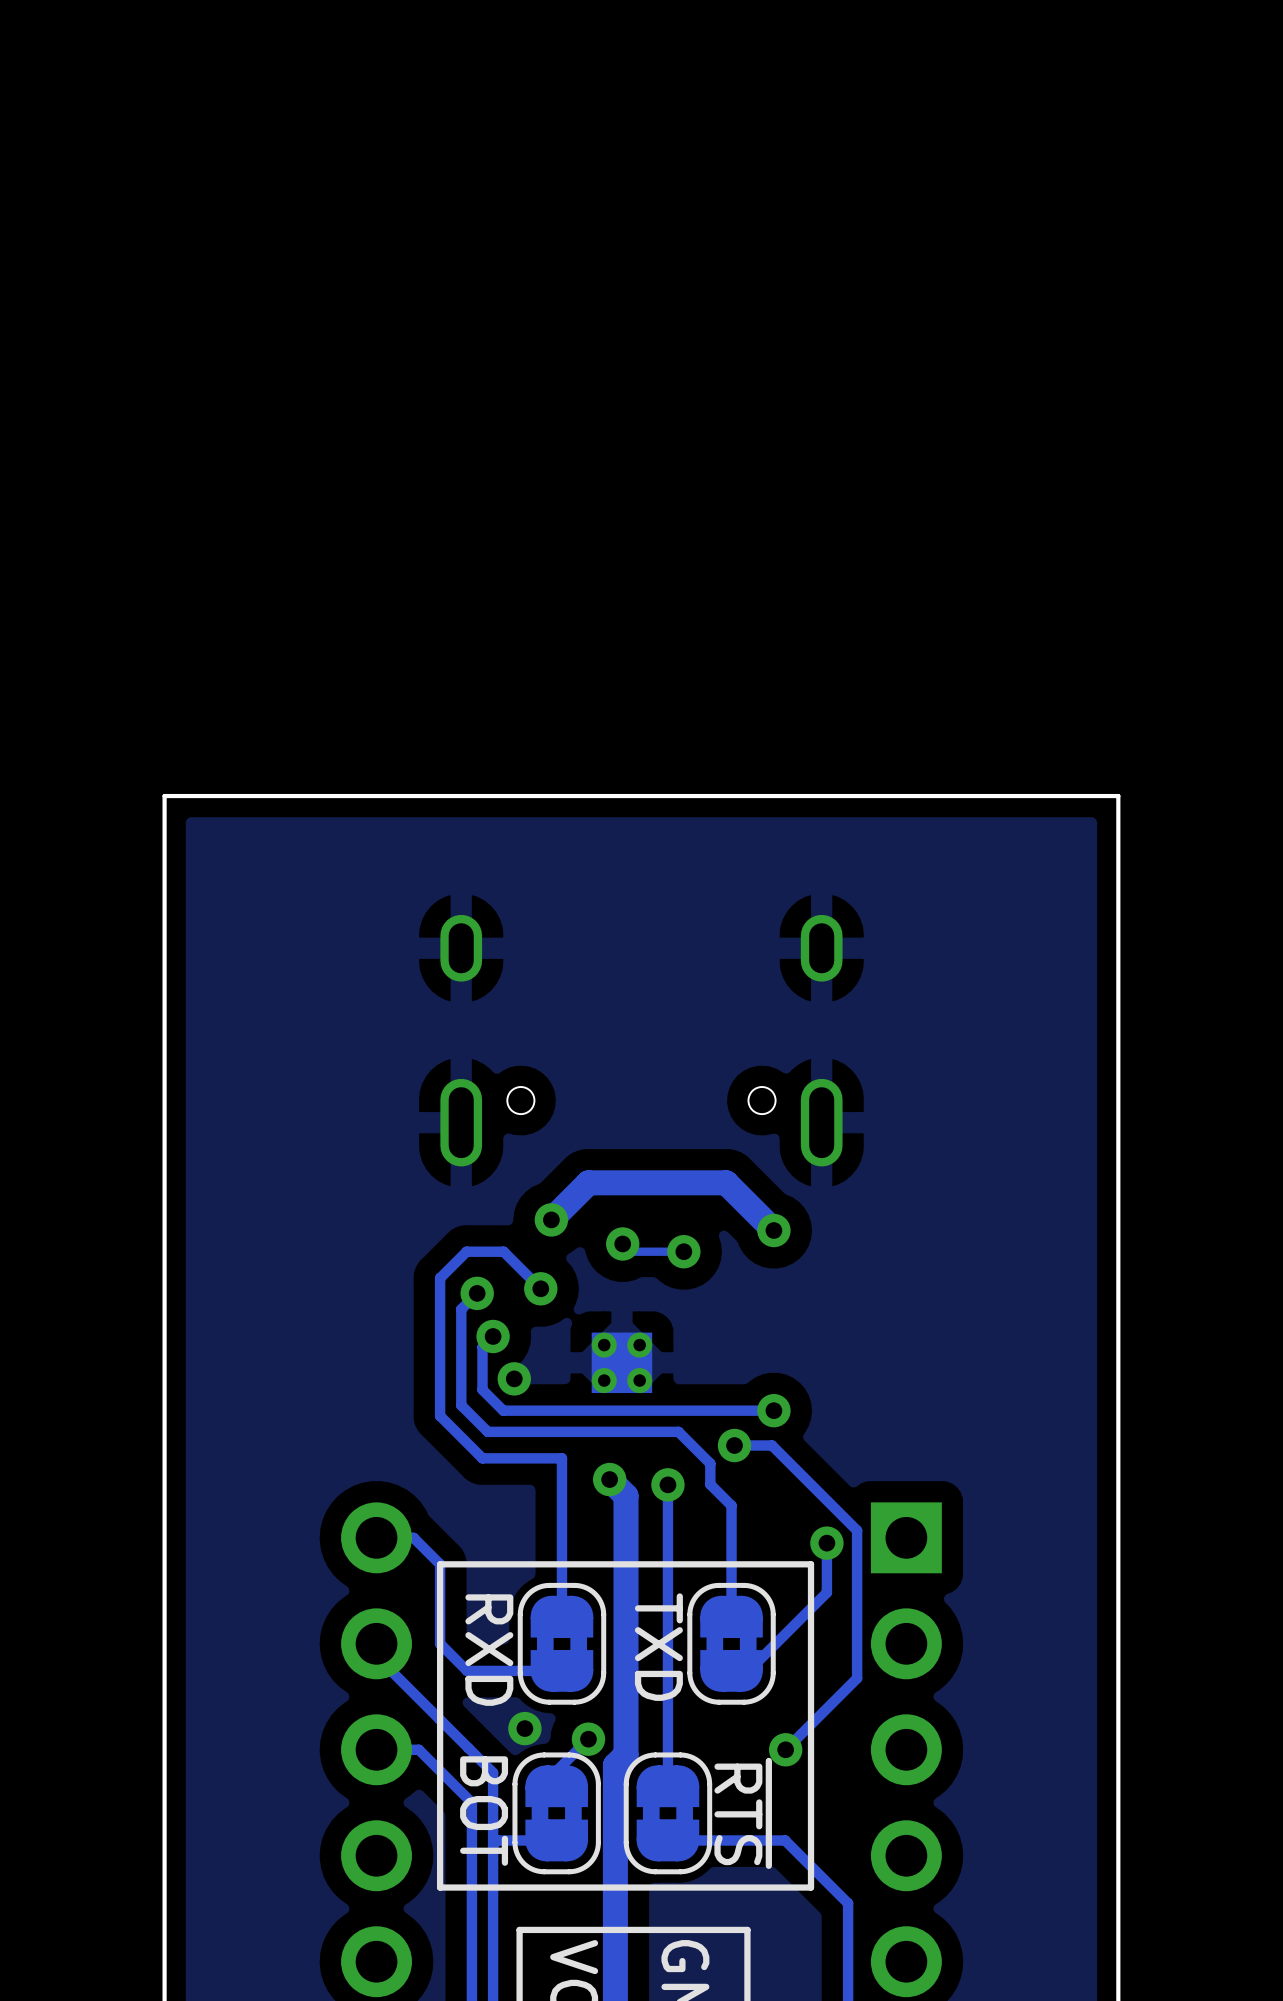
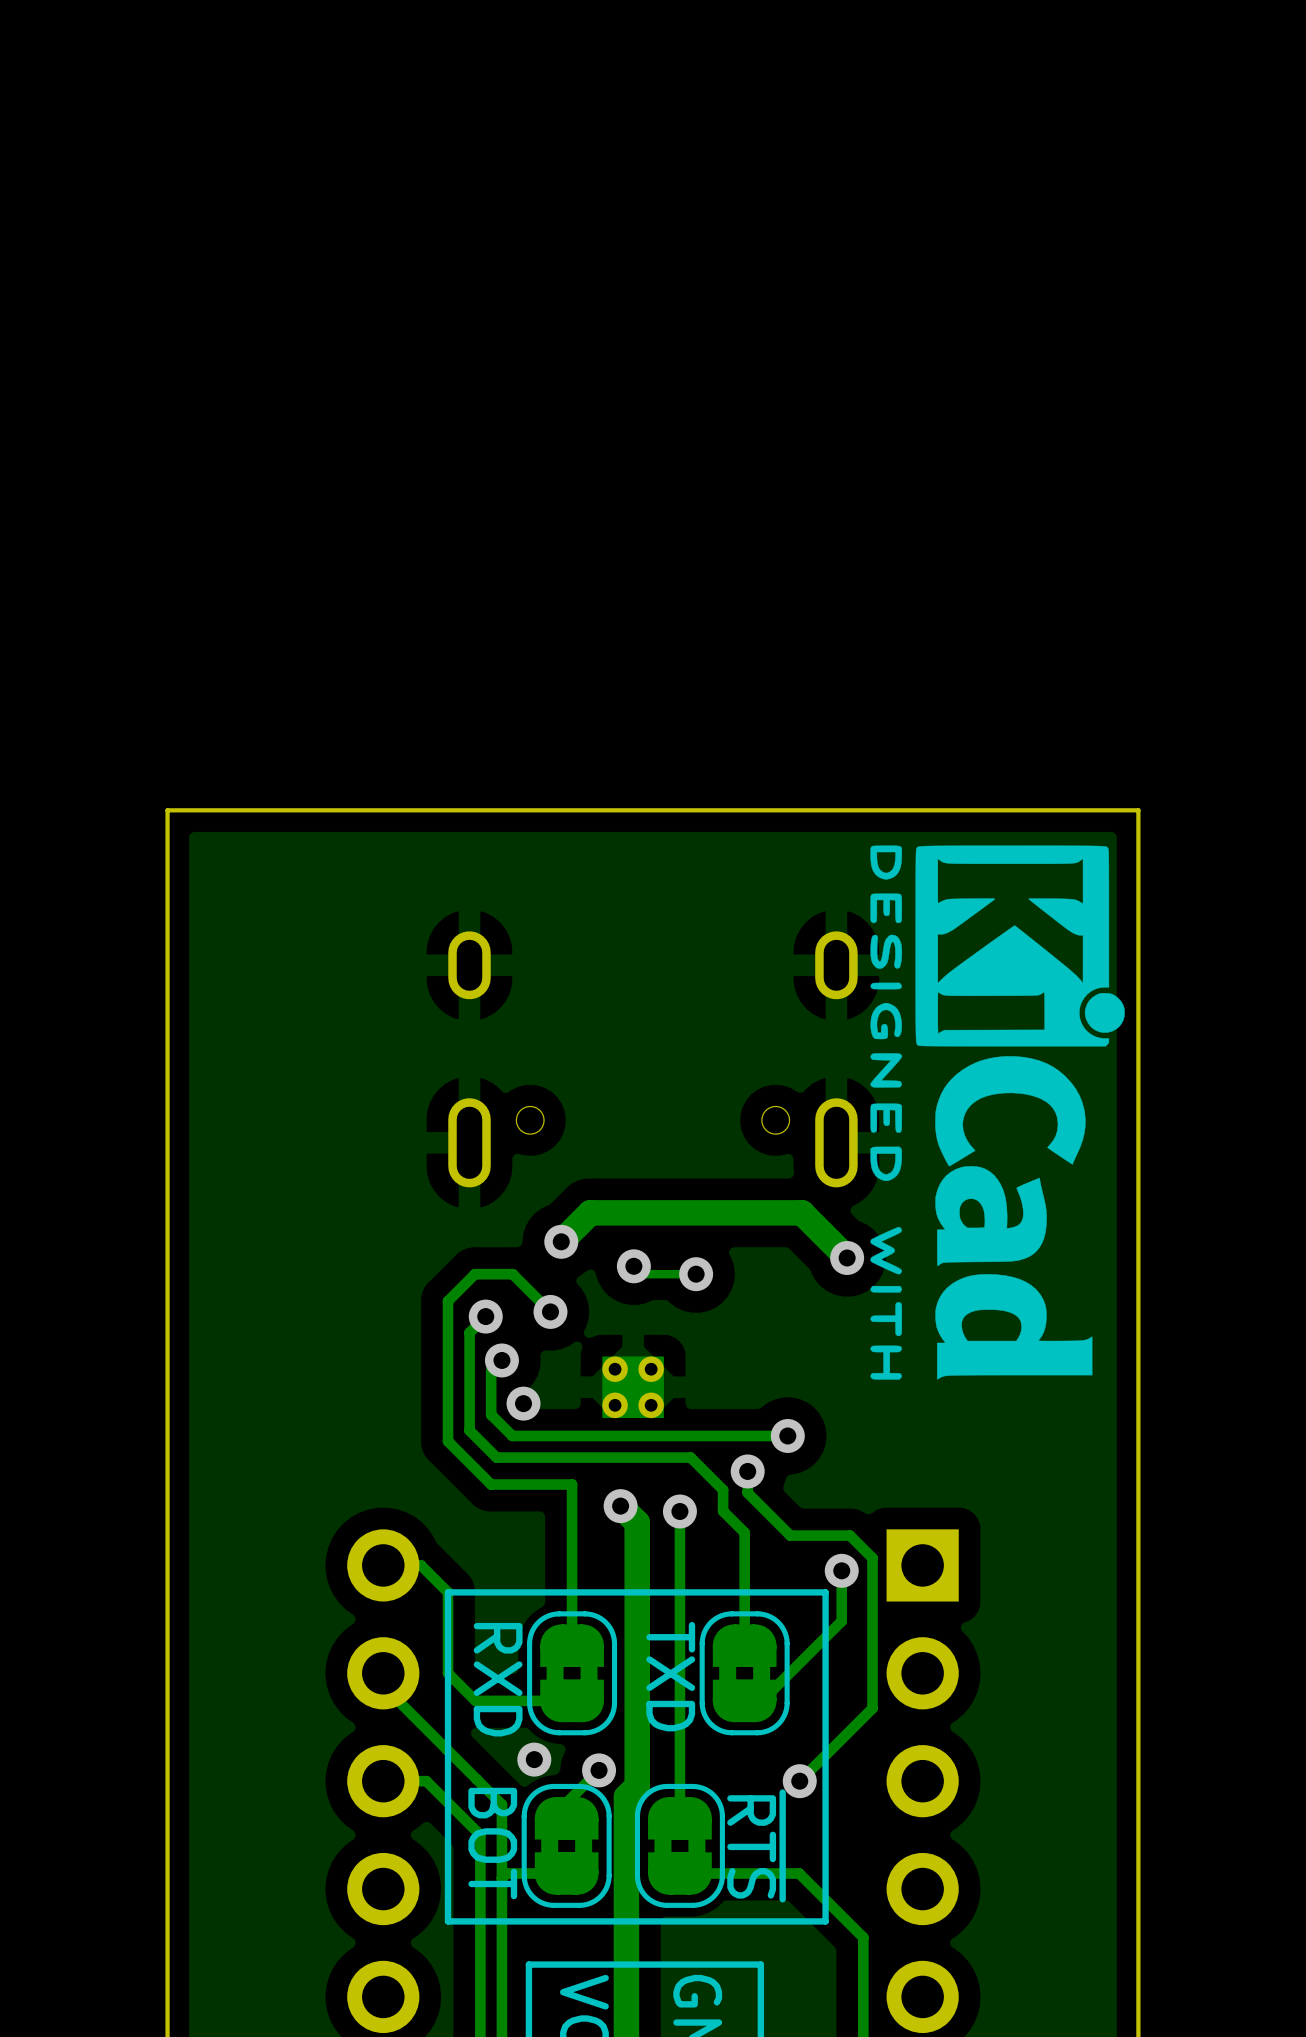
drawing: none -> [870, 845, 1125, 1380]
track: (579, 1191) (588, 1182) (726, 1182) (773, 1230) -> (590, 1212) (802, 1212) (847, 1257)
via position: (773, 1230) -> (847, 1257)
track: (734, 1445) (772, 1445) (835, 1508) -> (747, 1471) (747, 1492) (790, 1535) (850, 1535)

